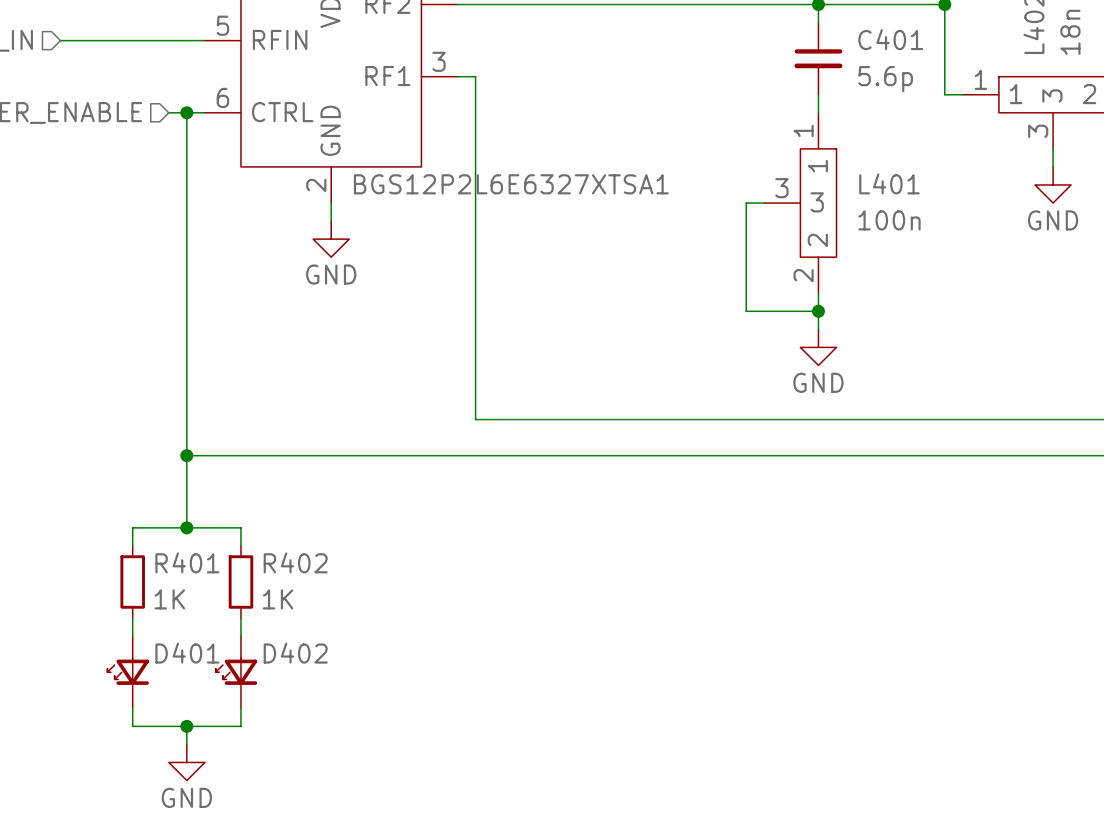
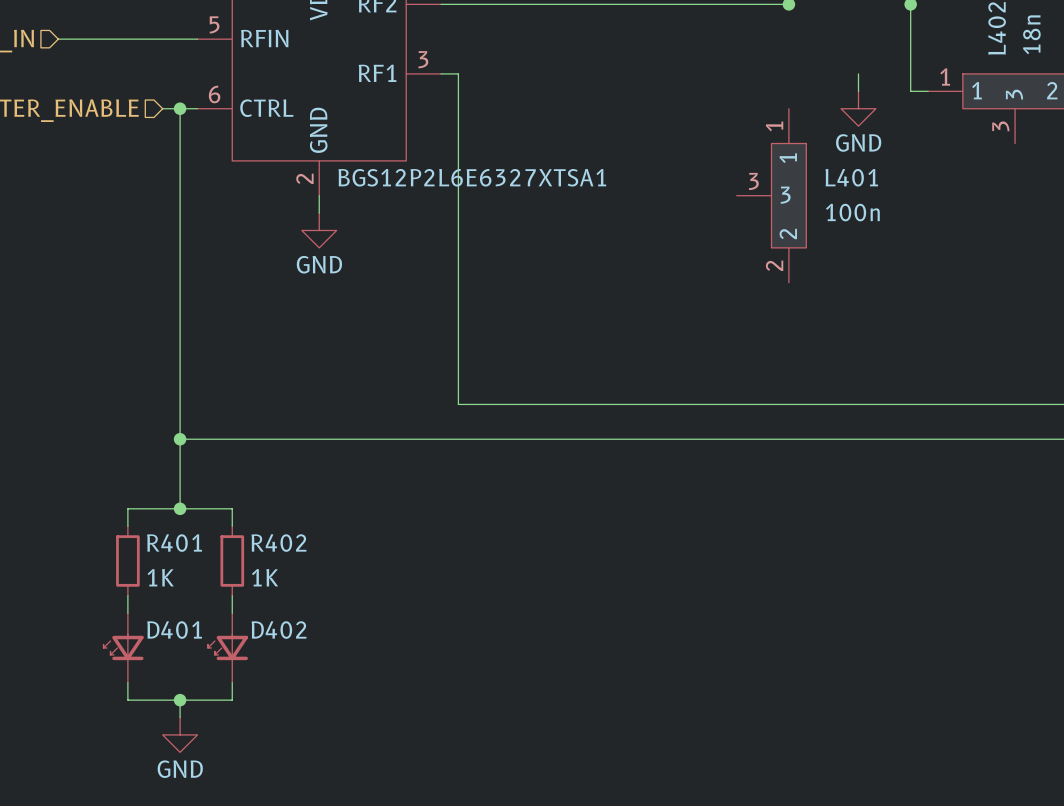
wire: (944, 4) (818, 4) (818, 22) -> none
C401: 5.6p (818, 58) -> none
wire: (818, 94) (818, 112) -> (858, 73) (858, 91)
power symbol: none -> GND (858, 108)
wire: (1053, 148) (1053, 166) -> none
power symbol: GND (1053, 184) -> none
wire: (764, 203) (746, 203) (746, 311) (818, 311) -> none
wire: (818, 293) (818, 329) -> none
junction: (818, 311) -> none
power symbol: GND (818, 347) -> none

